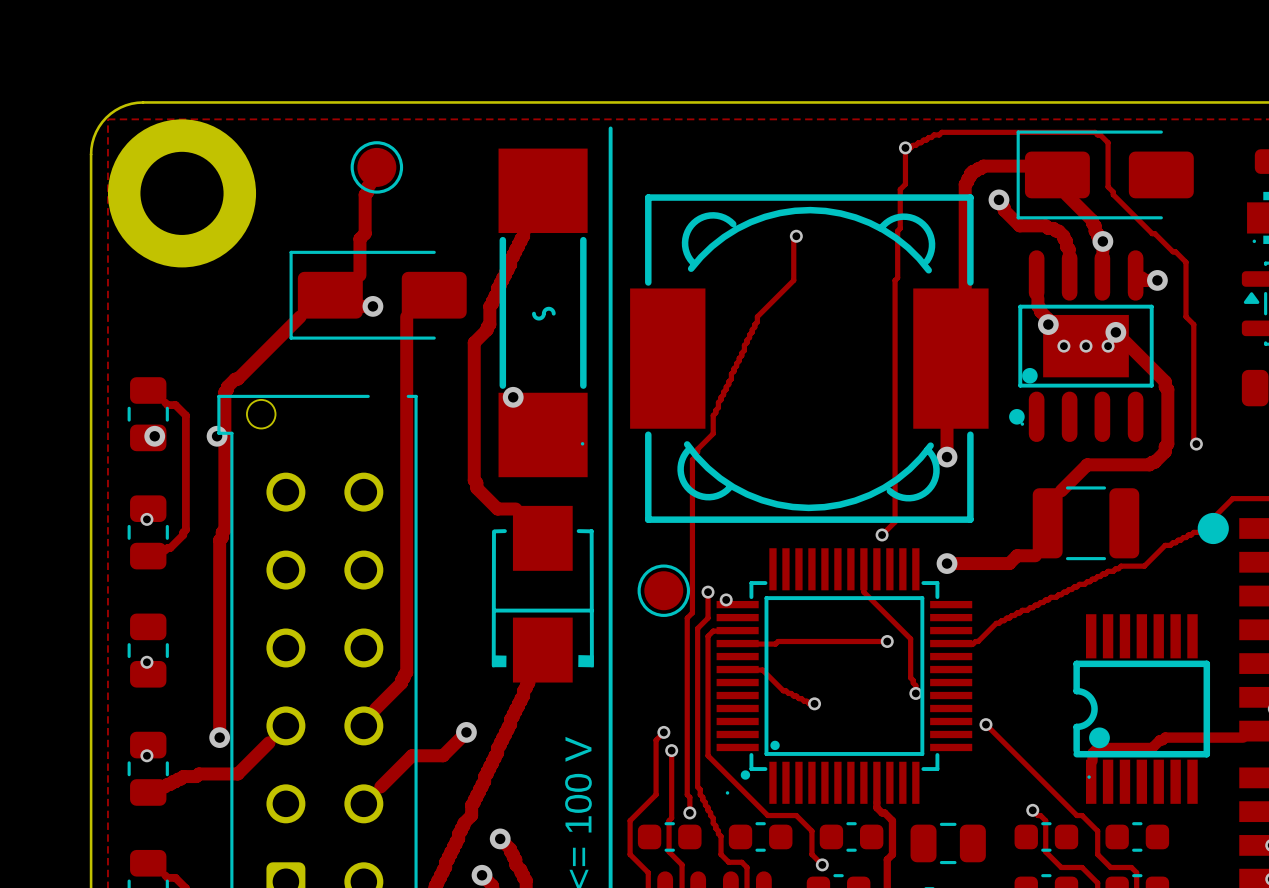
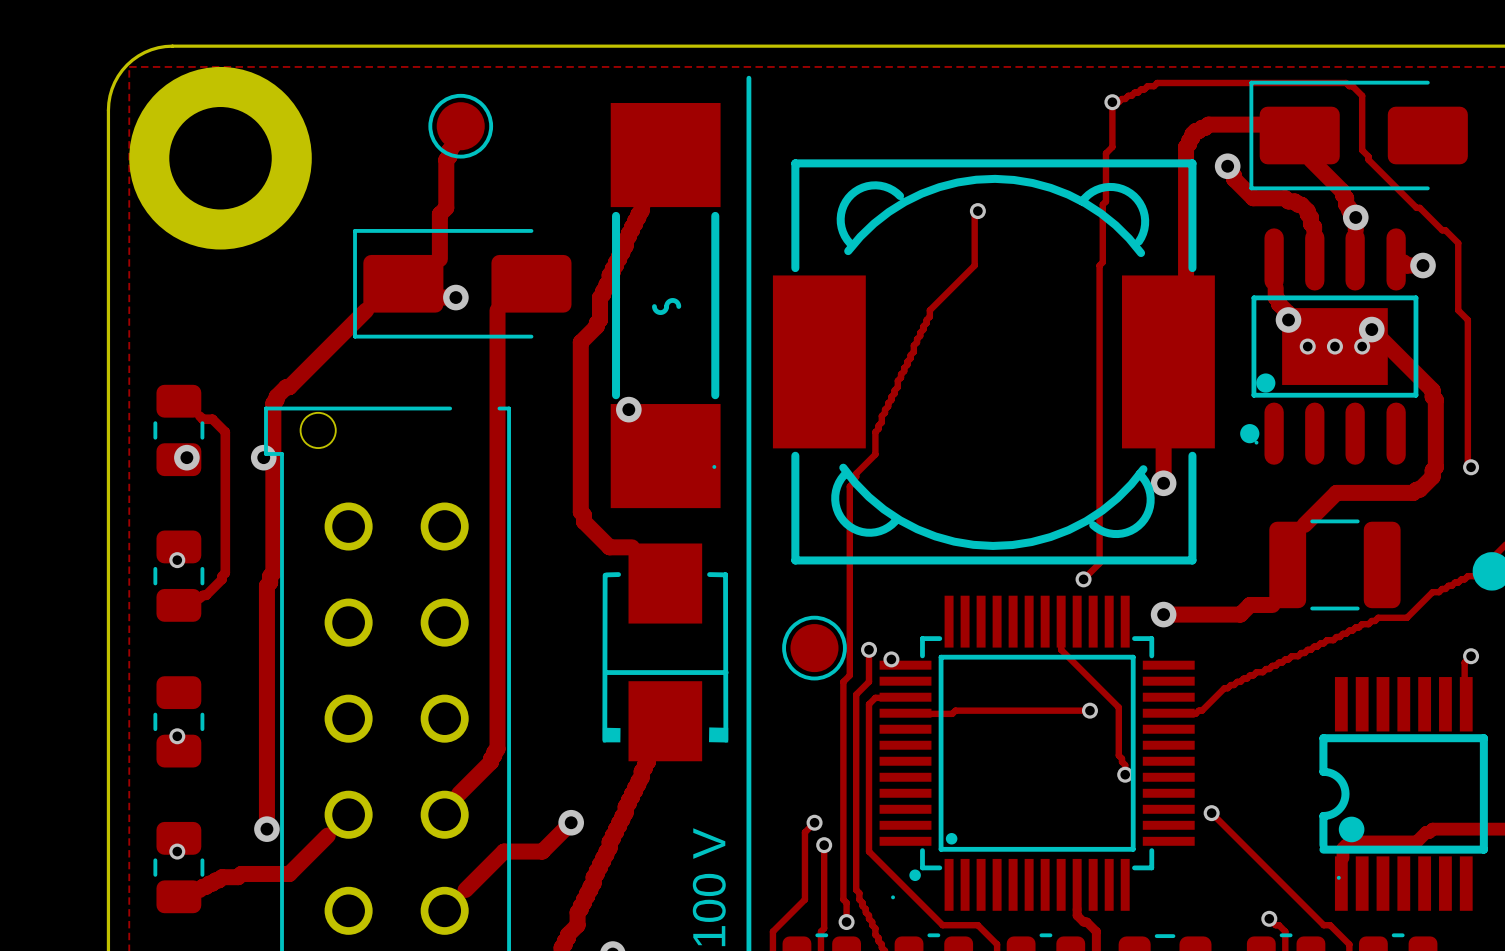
track: none -> (1471, 656) (1464, 662) (1464, 678)
via: none -> (1471, 656)
track: (757, 670) (762, 670) (783, 690) (809, 703) (814, 703) -> none
via: (814, 703) -> none

